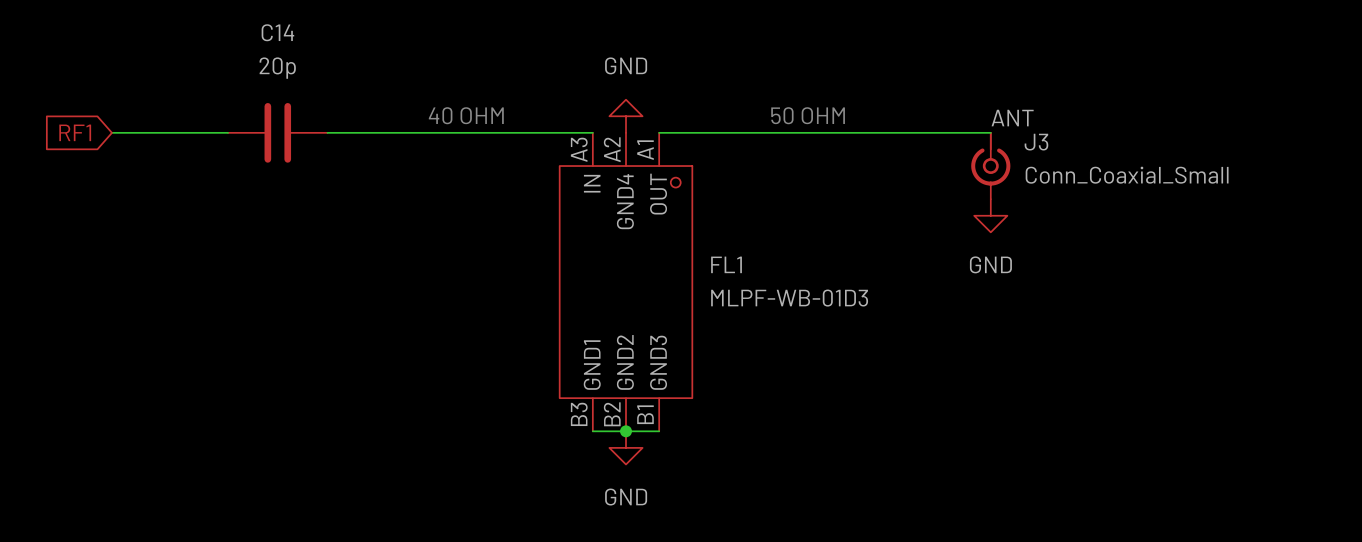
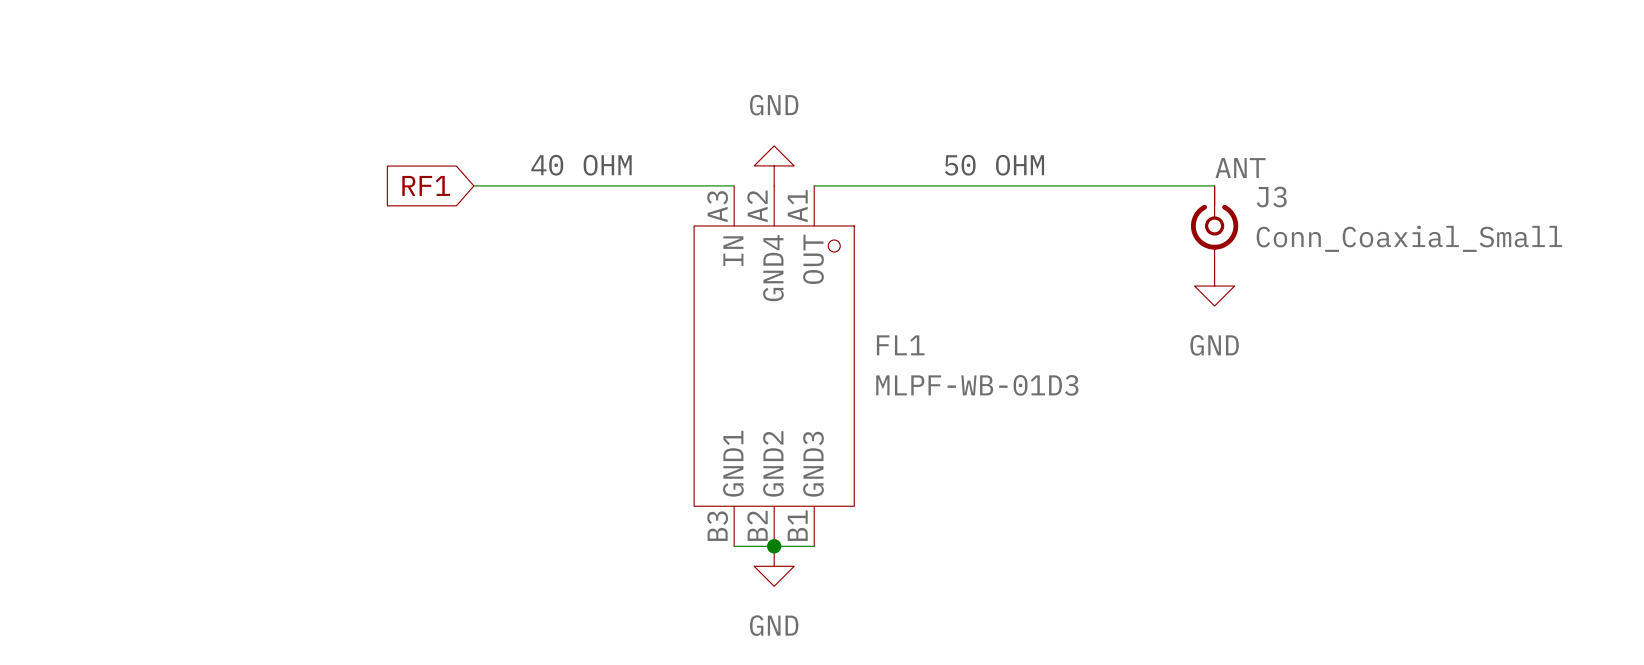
global label position: RF1 (75, 132) -> RF1 (426, 185)
wire: (111, 132) (228, 132) -> none
C14: 20p (277, 132) -> none
wire: (327, 132) (377, 132) -> none

